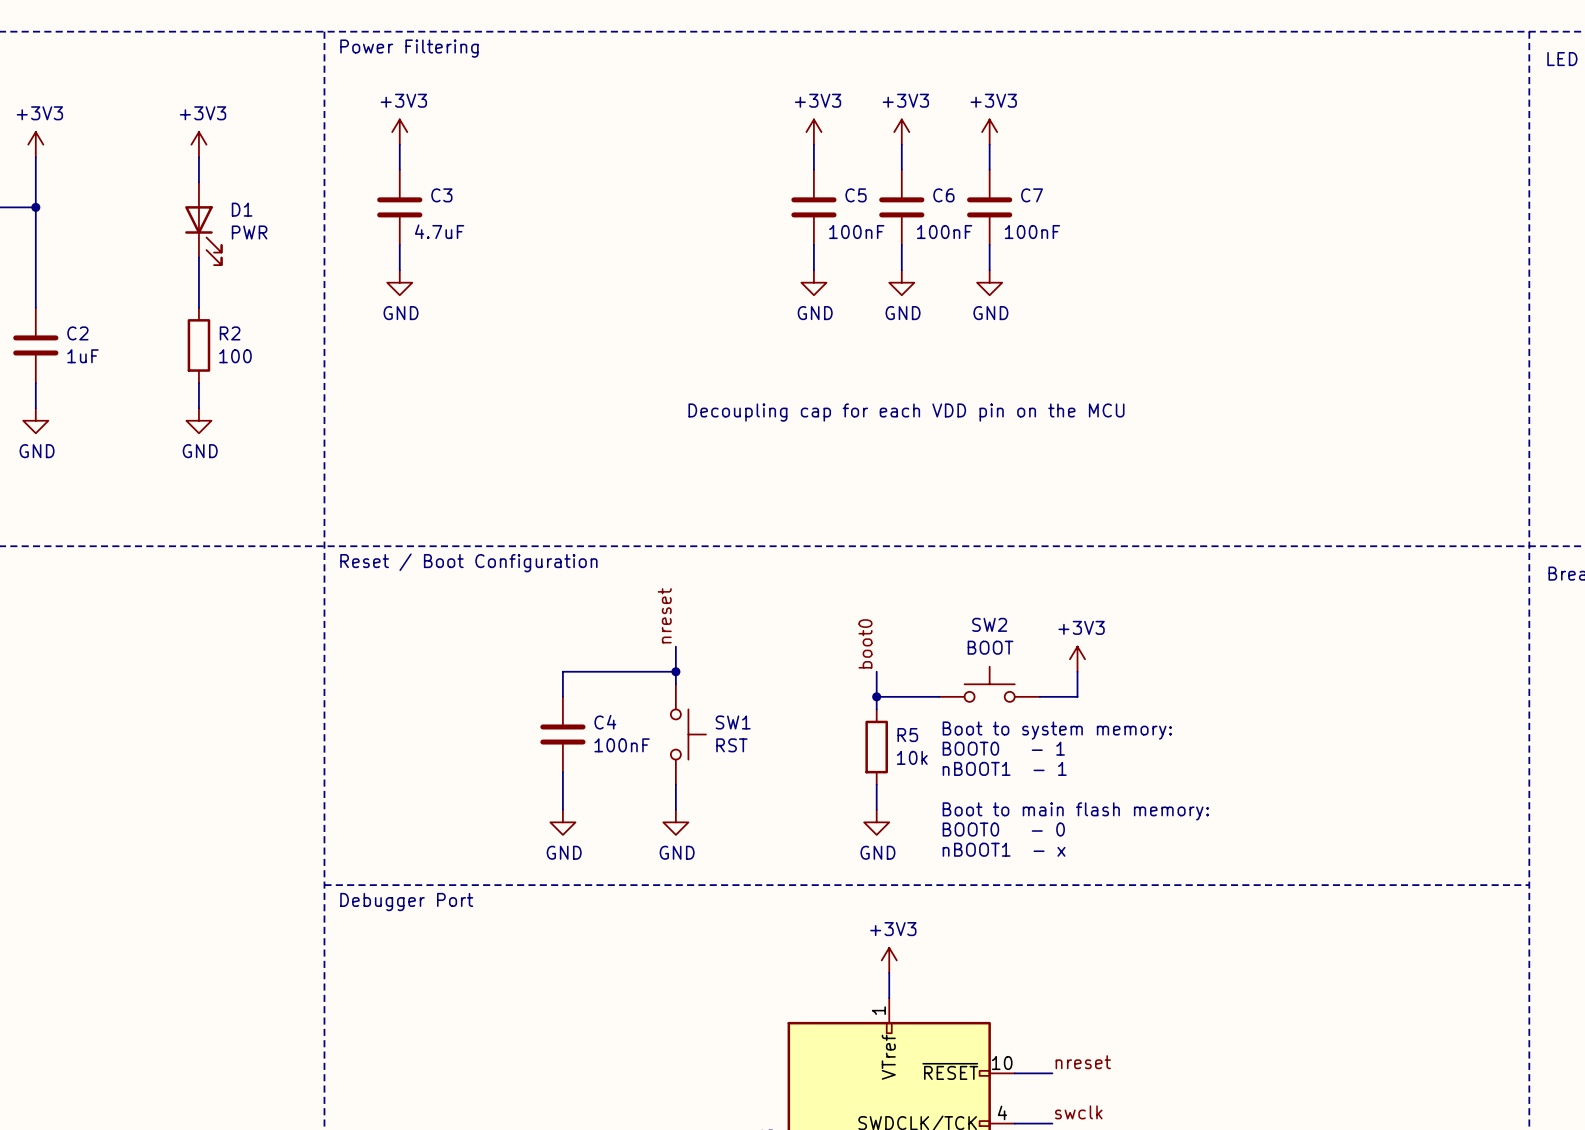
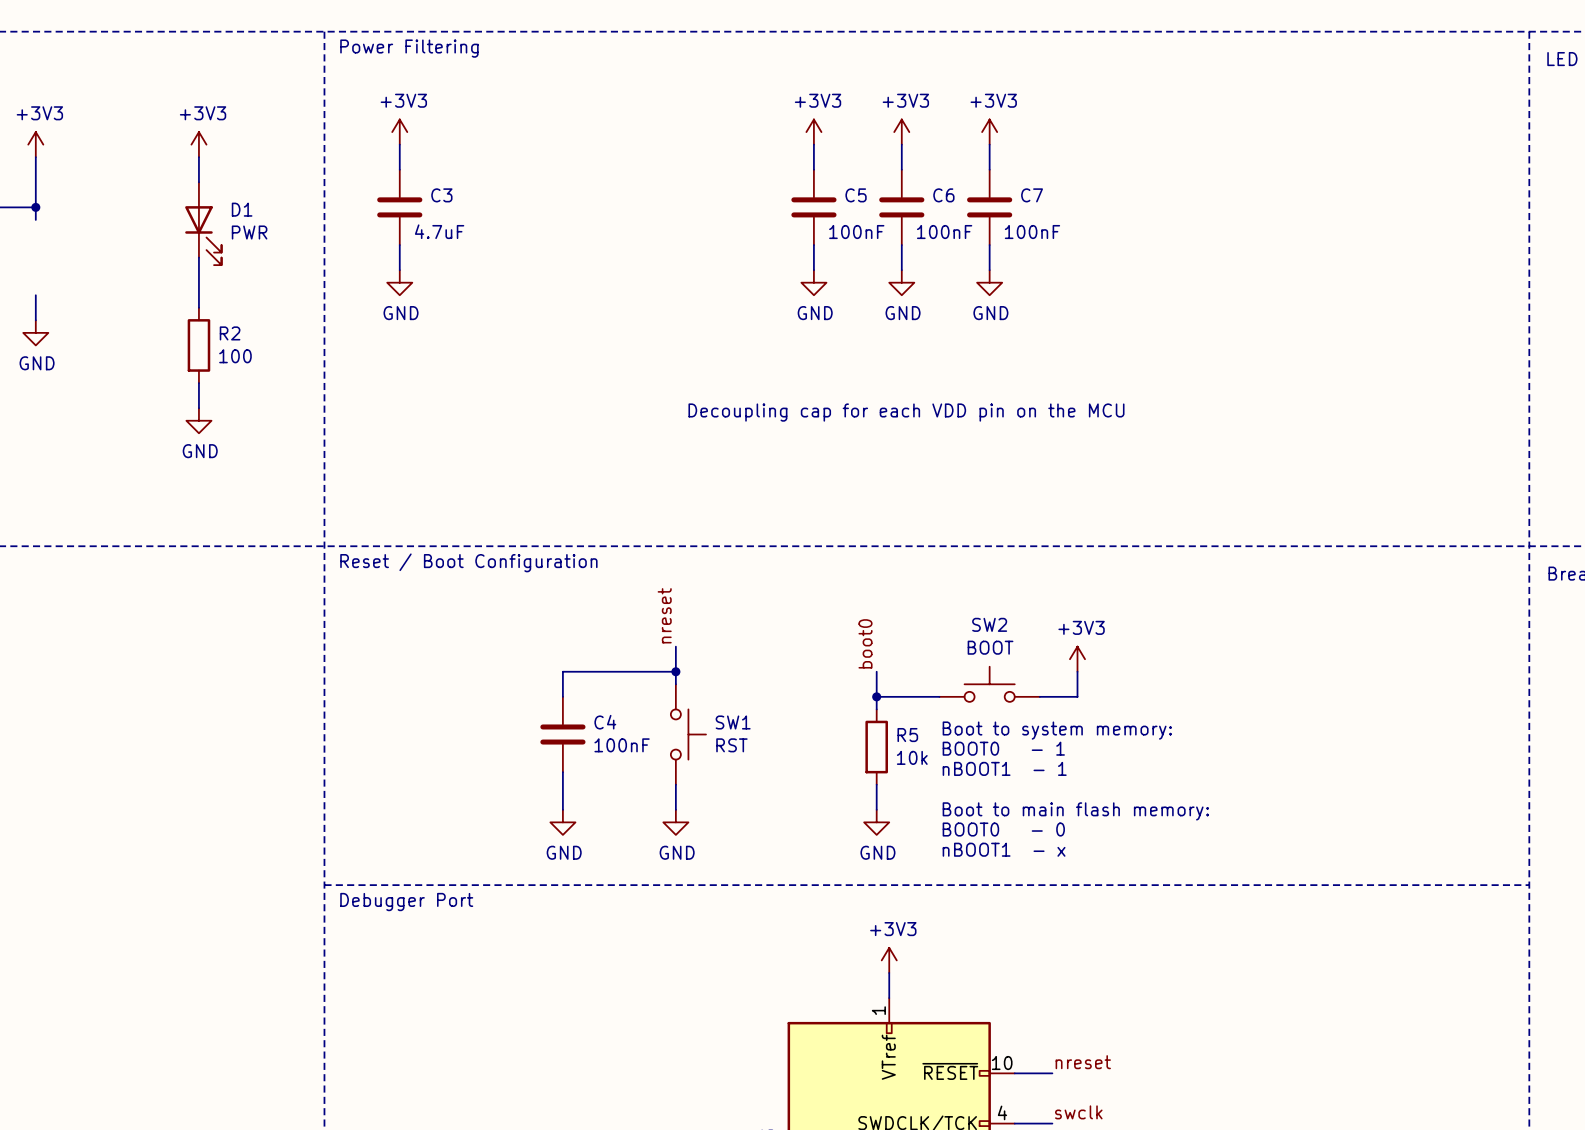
wire: (35, 219) (35, 295) -> none
power symbol: none -> GND (35, 332)
C2: 1uF (35, 345) -> none
wire: (35, 383) (35, 408) -> none
power symbol: GND (35, 420) -> none

